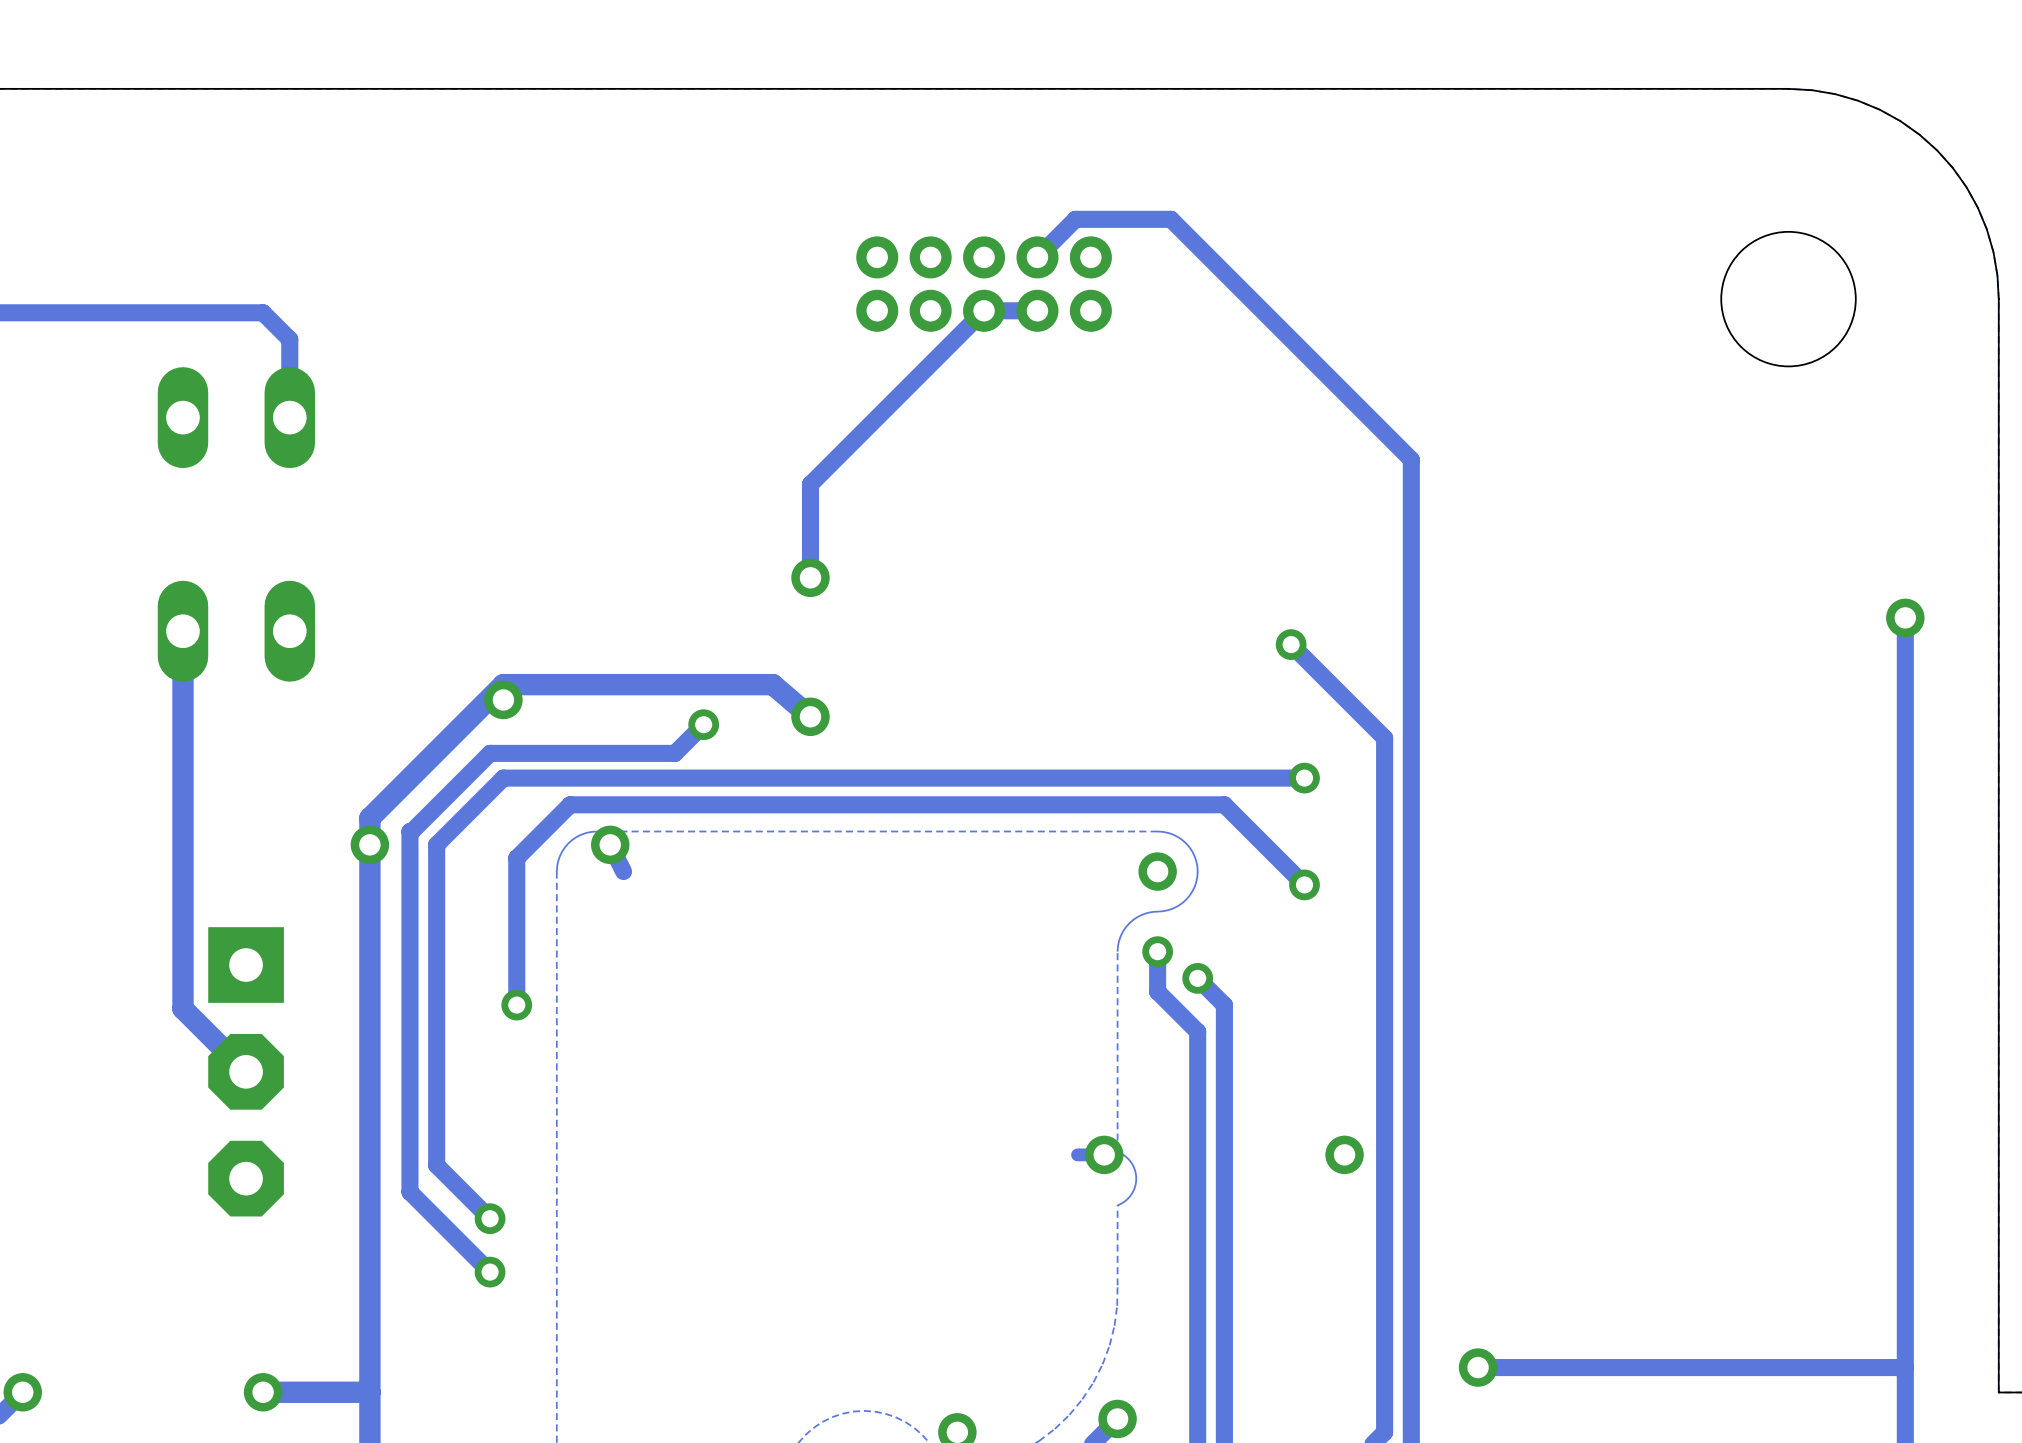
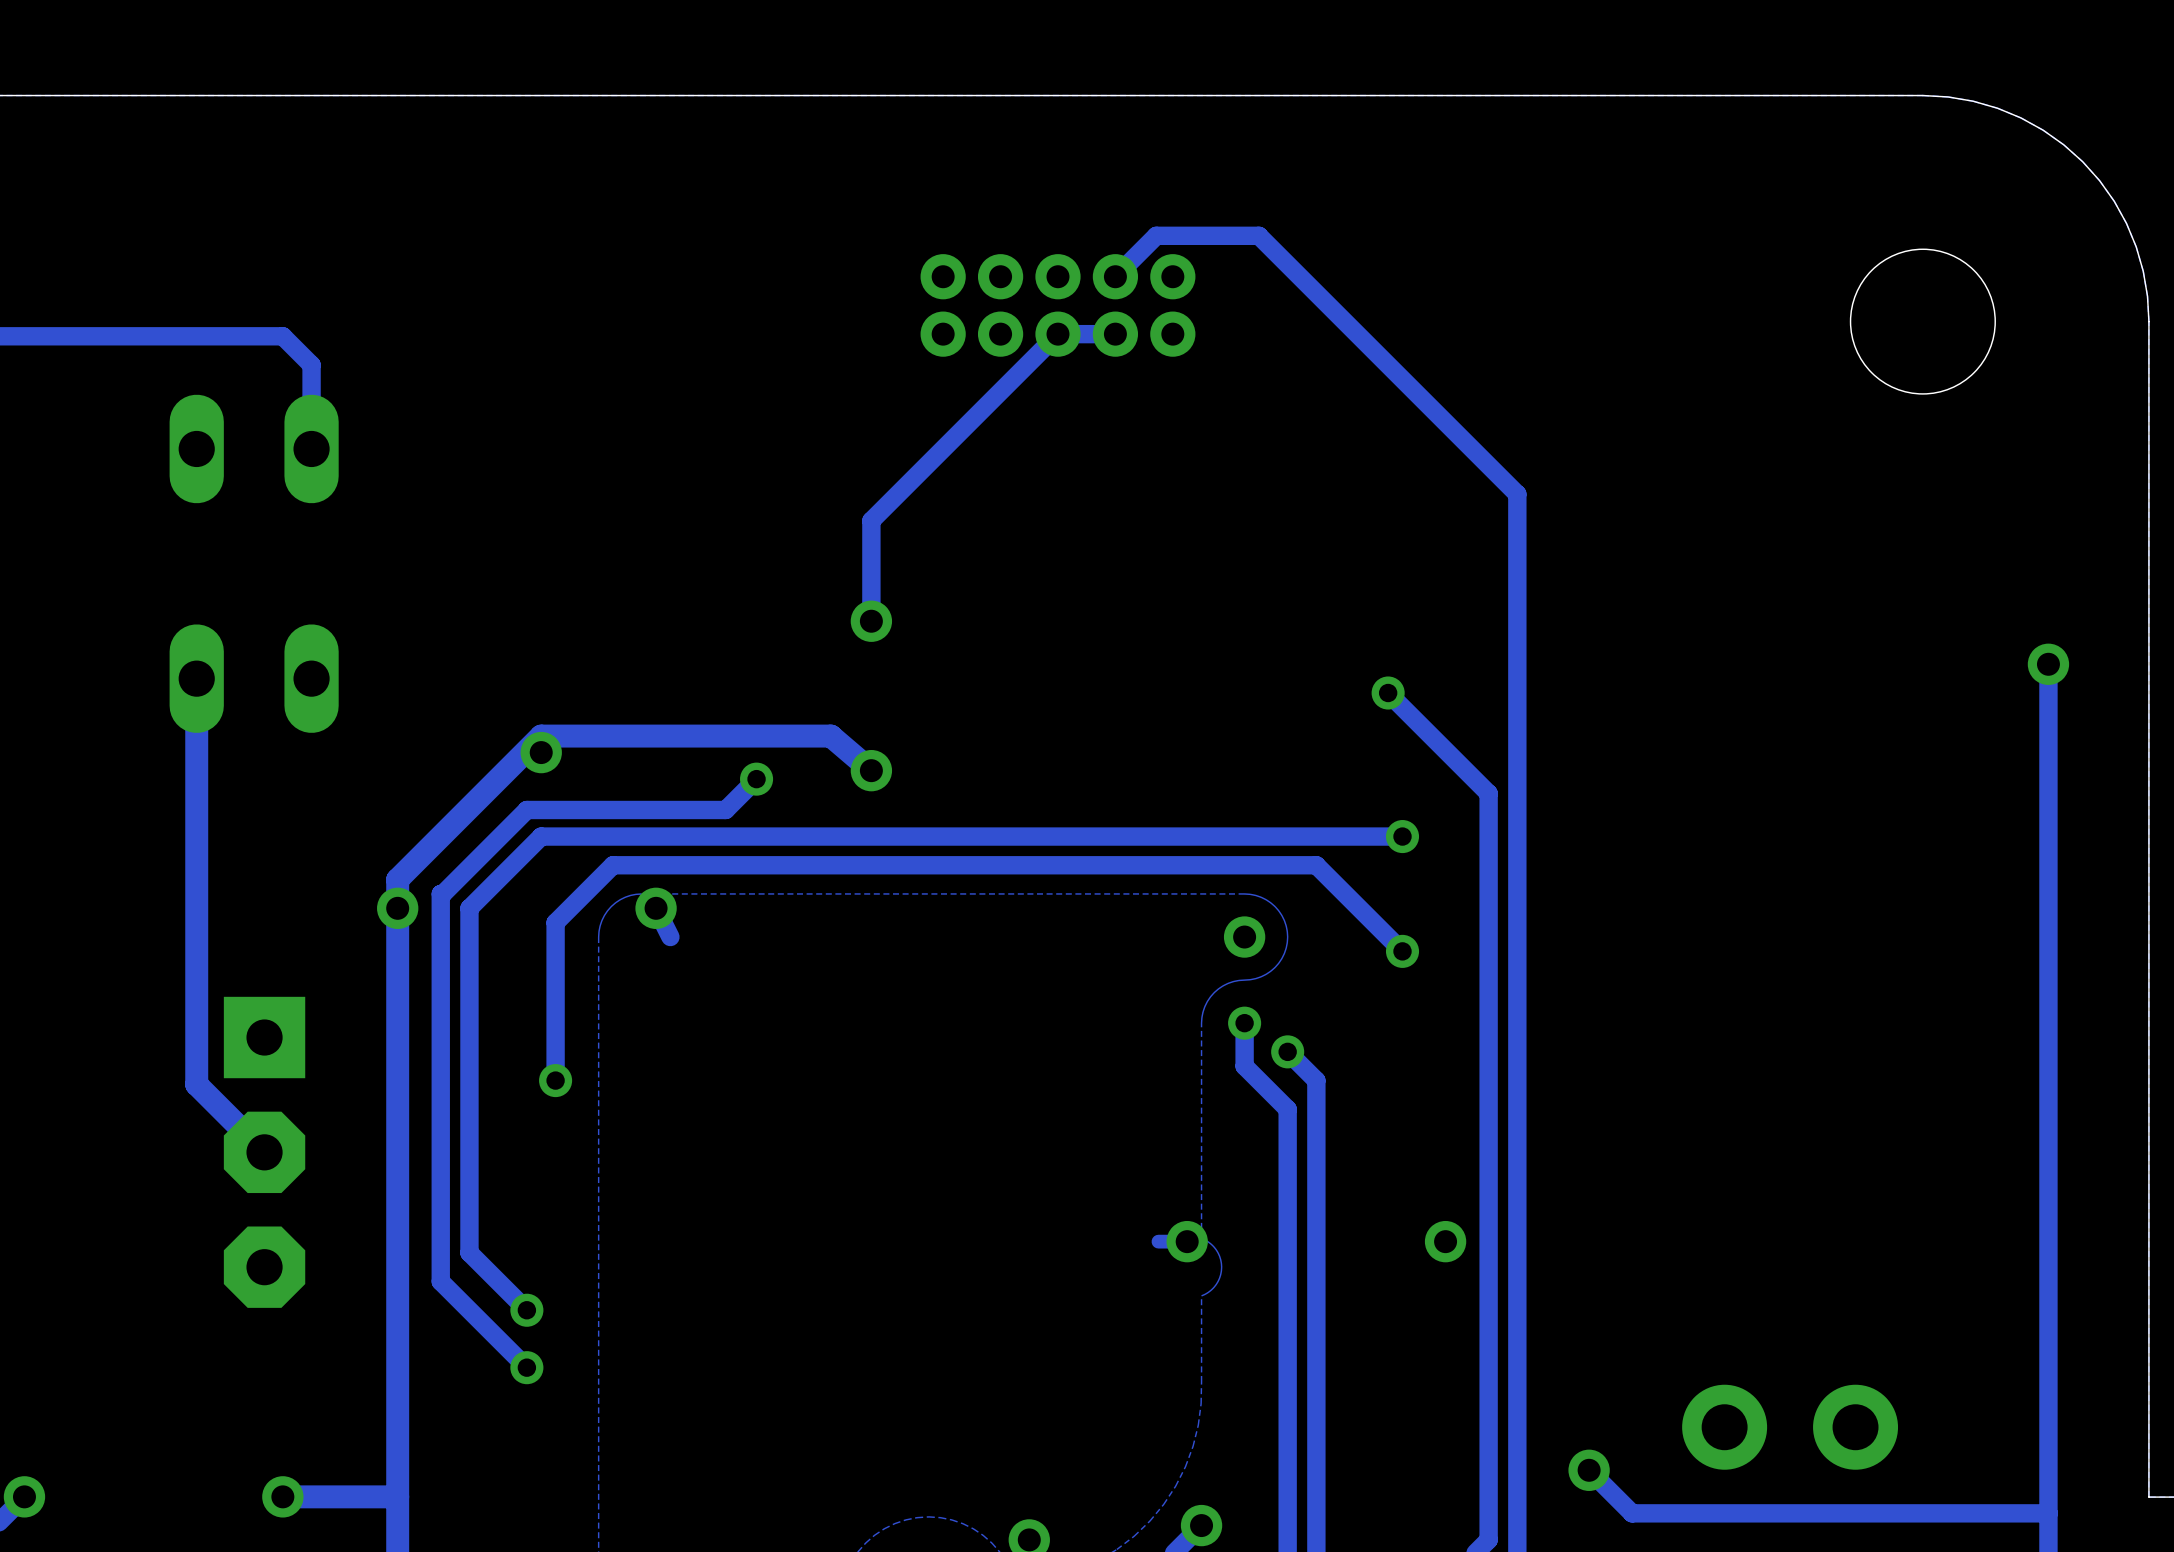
part: none -> (1790, 1427)
track: (1905, 1367) (1478, 1367) -> (2048, 1513) (1632, 1513) (1589, 1470)

